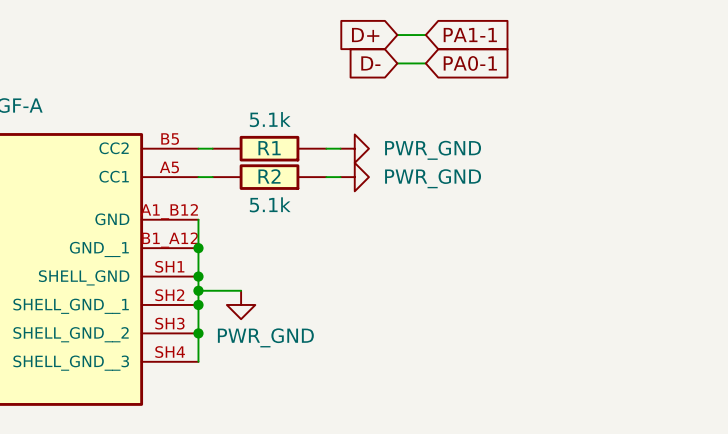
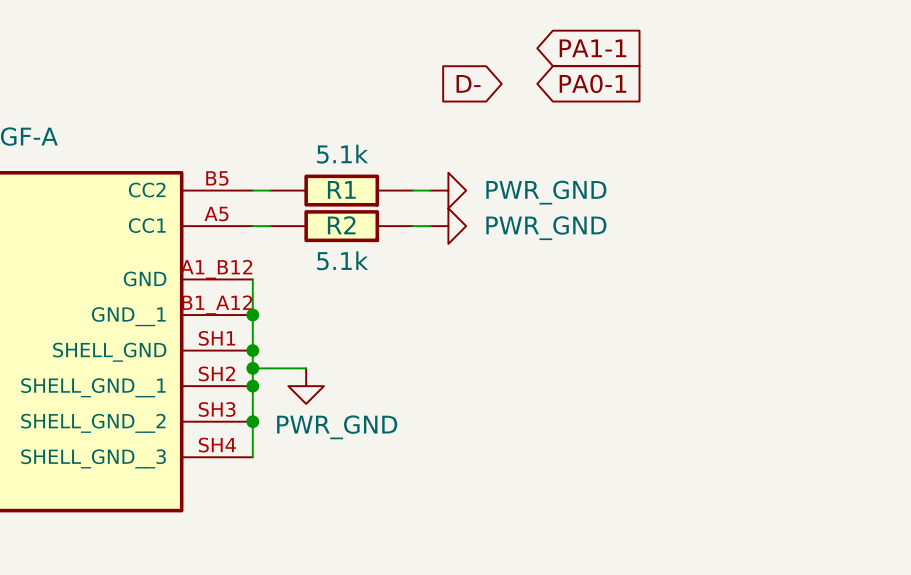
global label: D+ (365, 35) -> none
wire: (397, 35) (425, 35) -> none
wire: (397, 63) (425, 63) -> none

